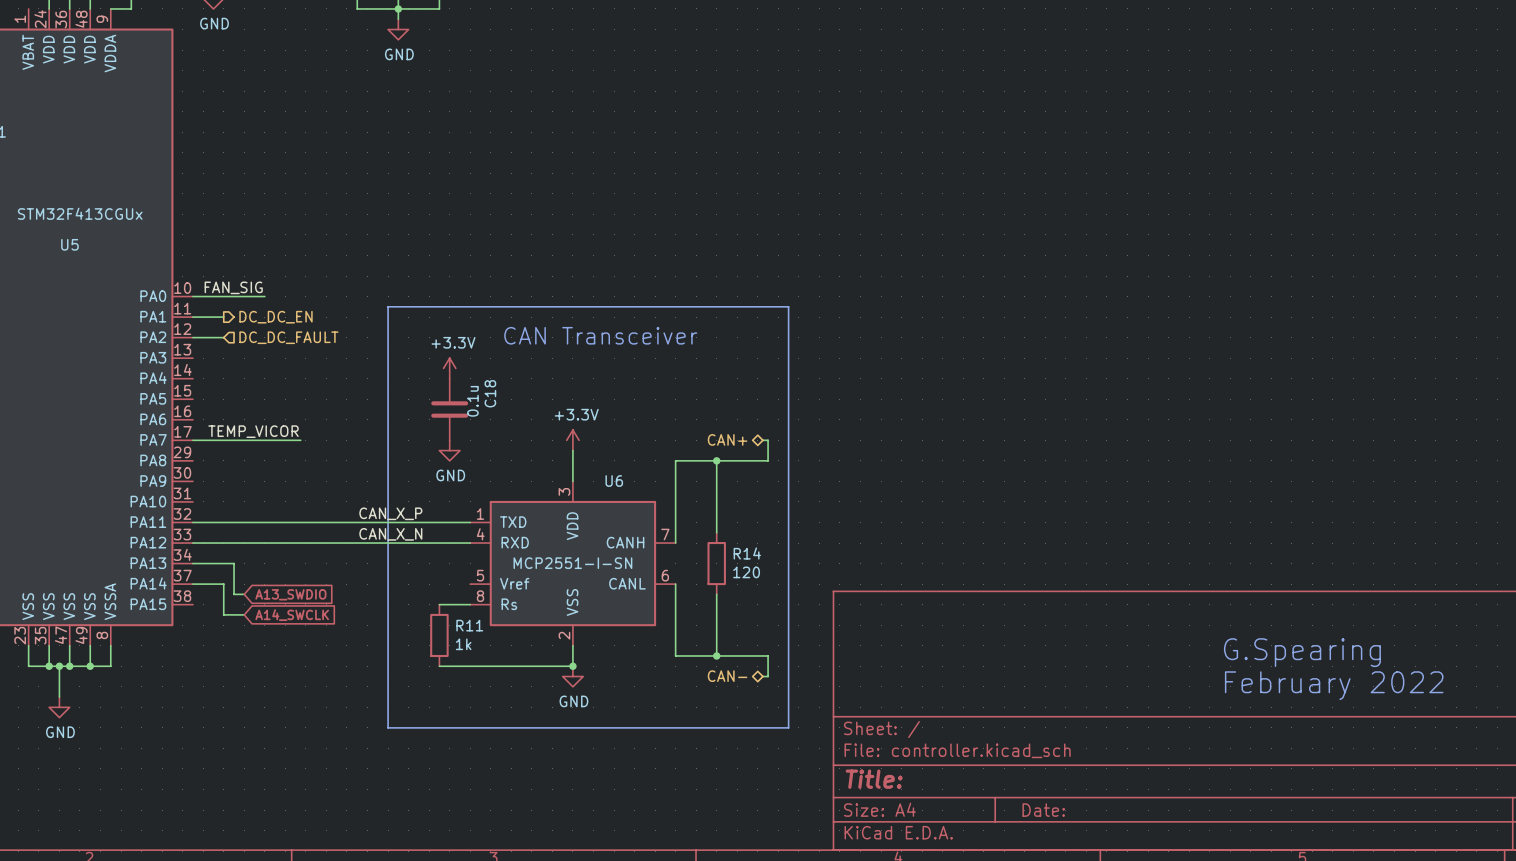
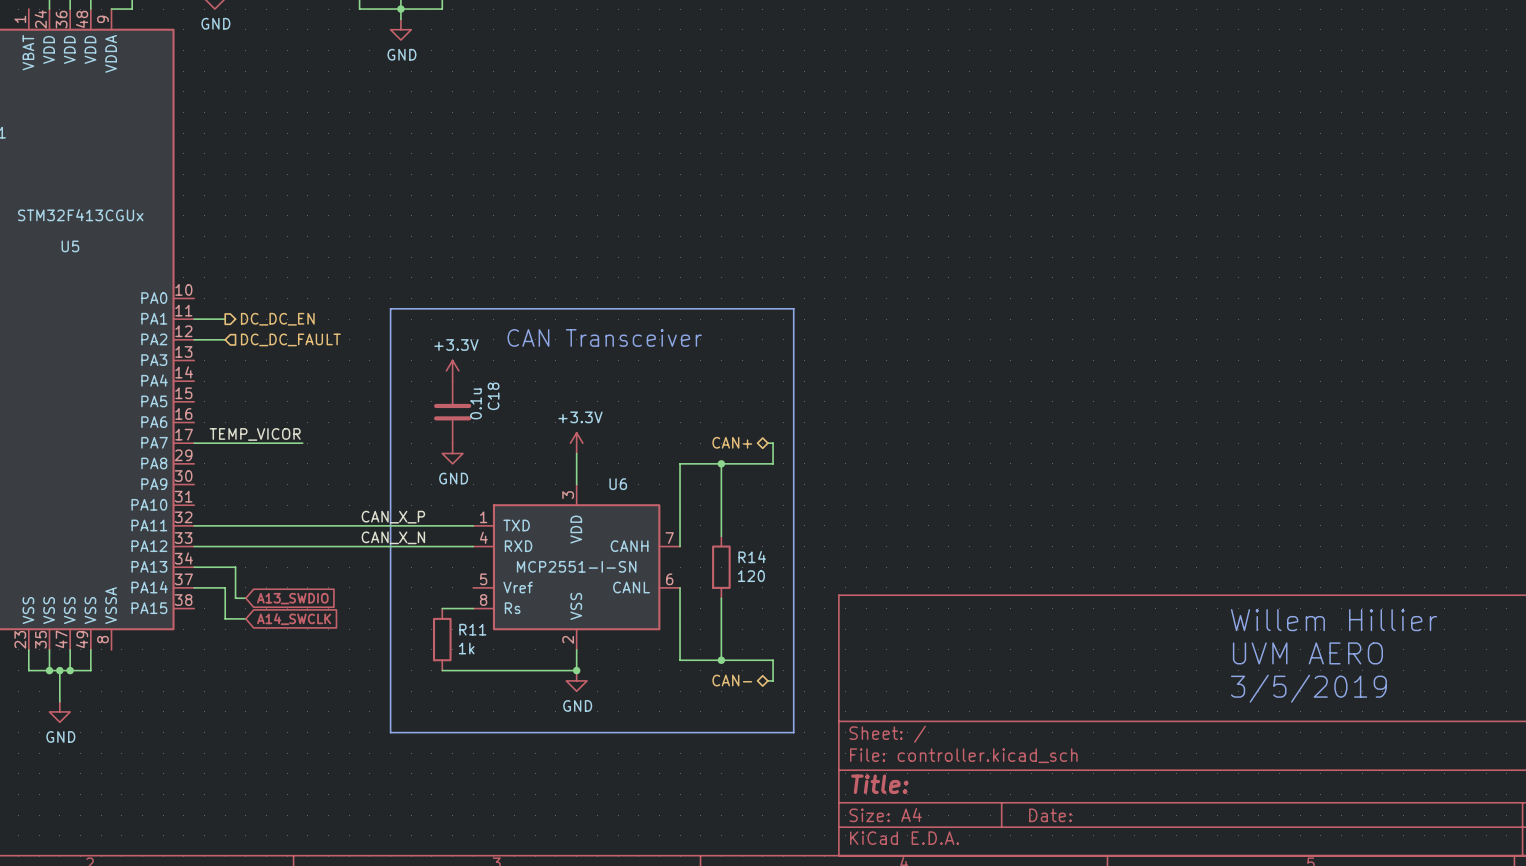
label: FAN_SIG (233, 287) -> none
wire: (192, 296) (264, 296) -> none
text: none -> Willem Hillier (1334, 620)
wire: (110, 645) (110, 666) (90, 666) -> none
text: G.Spearing (1302, 652) -> UVM AERO (1307, 653)
junction: (90, 666) -> none
text: February 2022 (1334, 685) -> 3/5/2019 (1308, 688)

